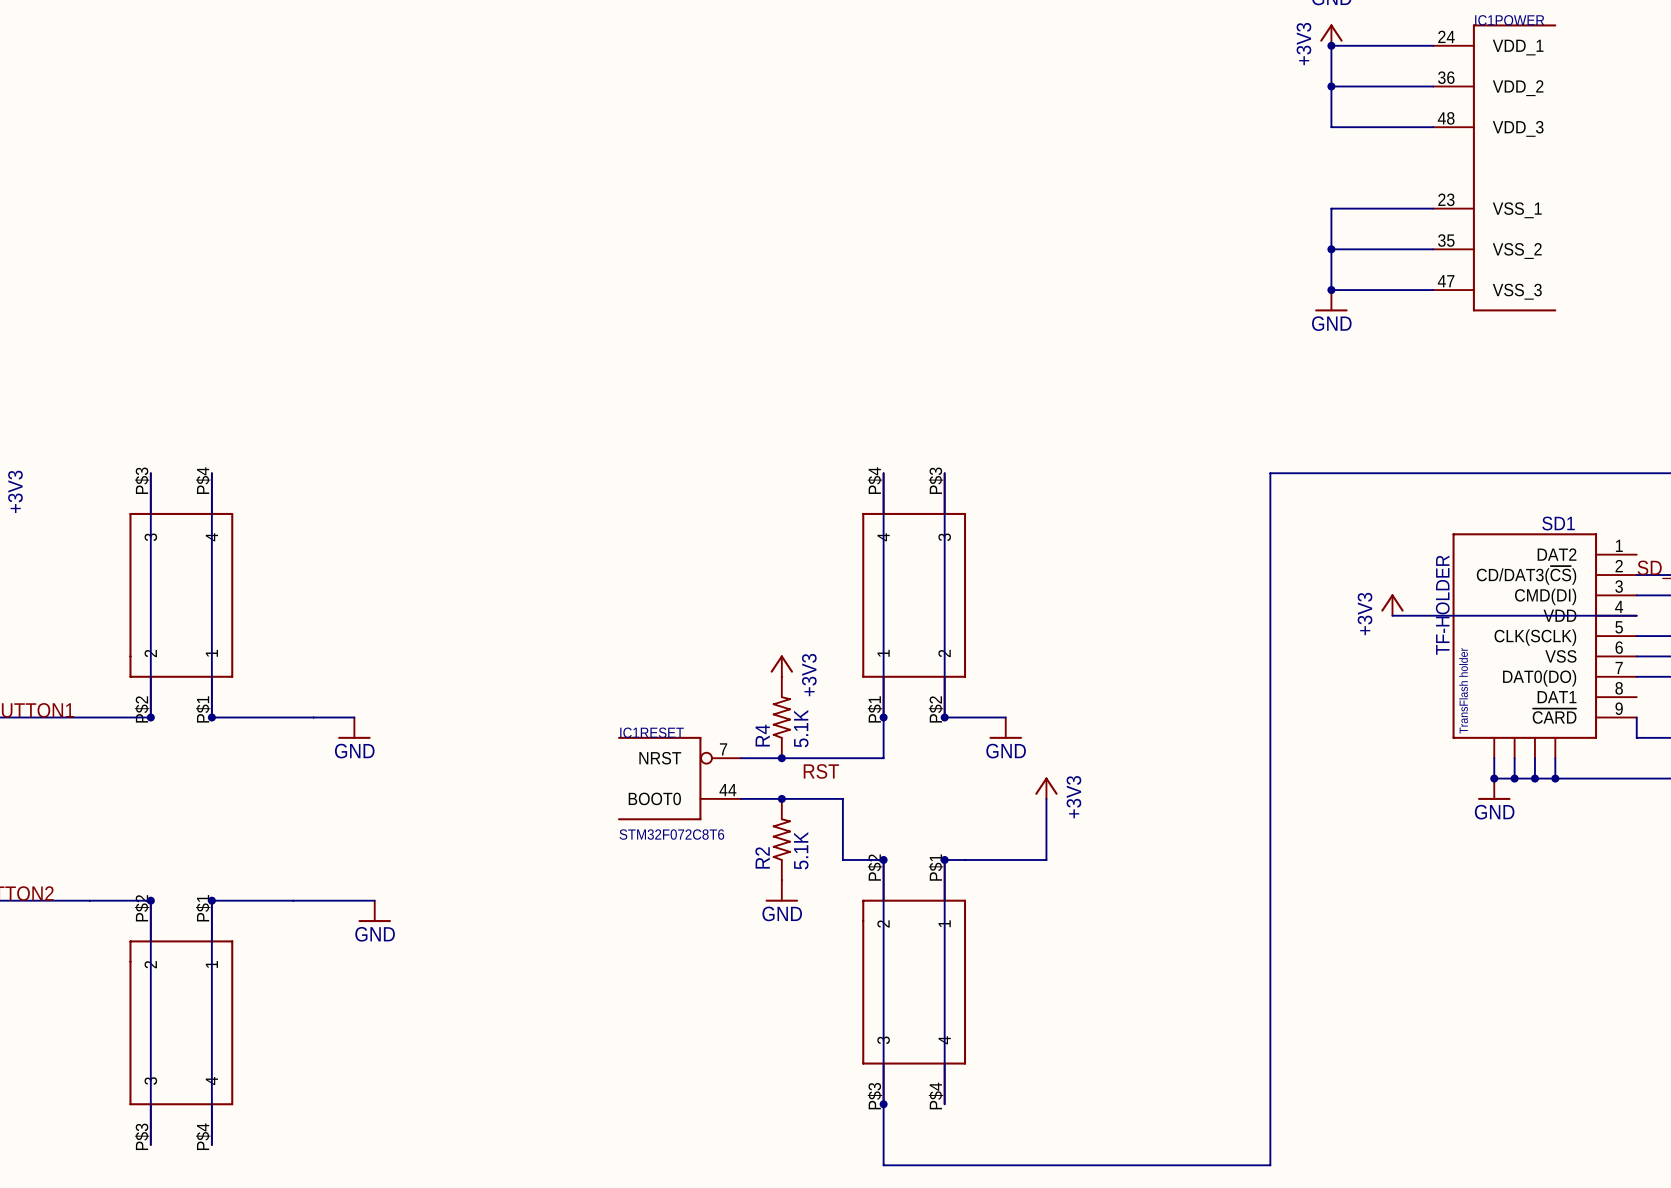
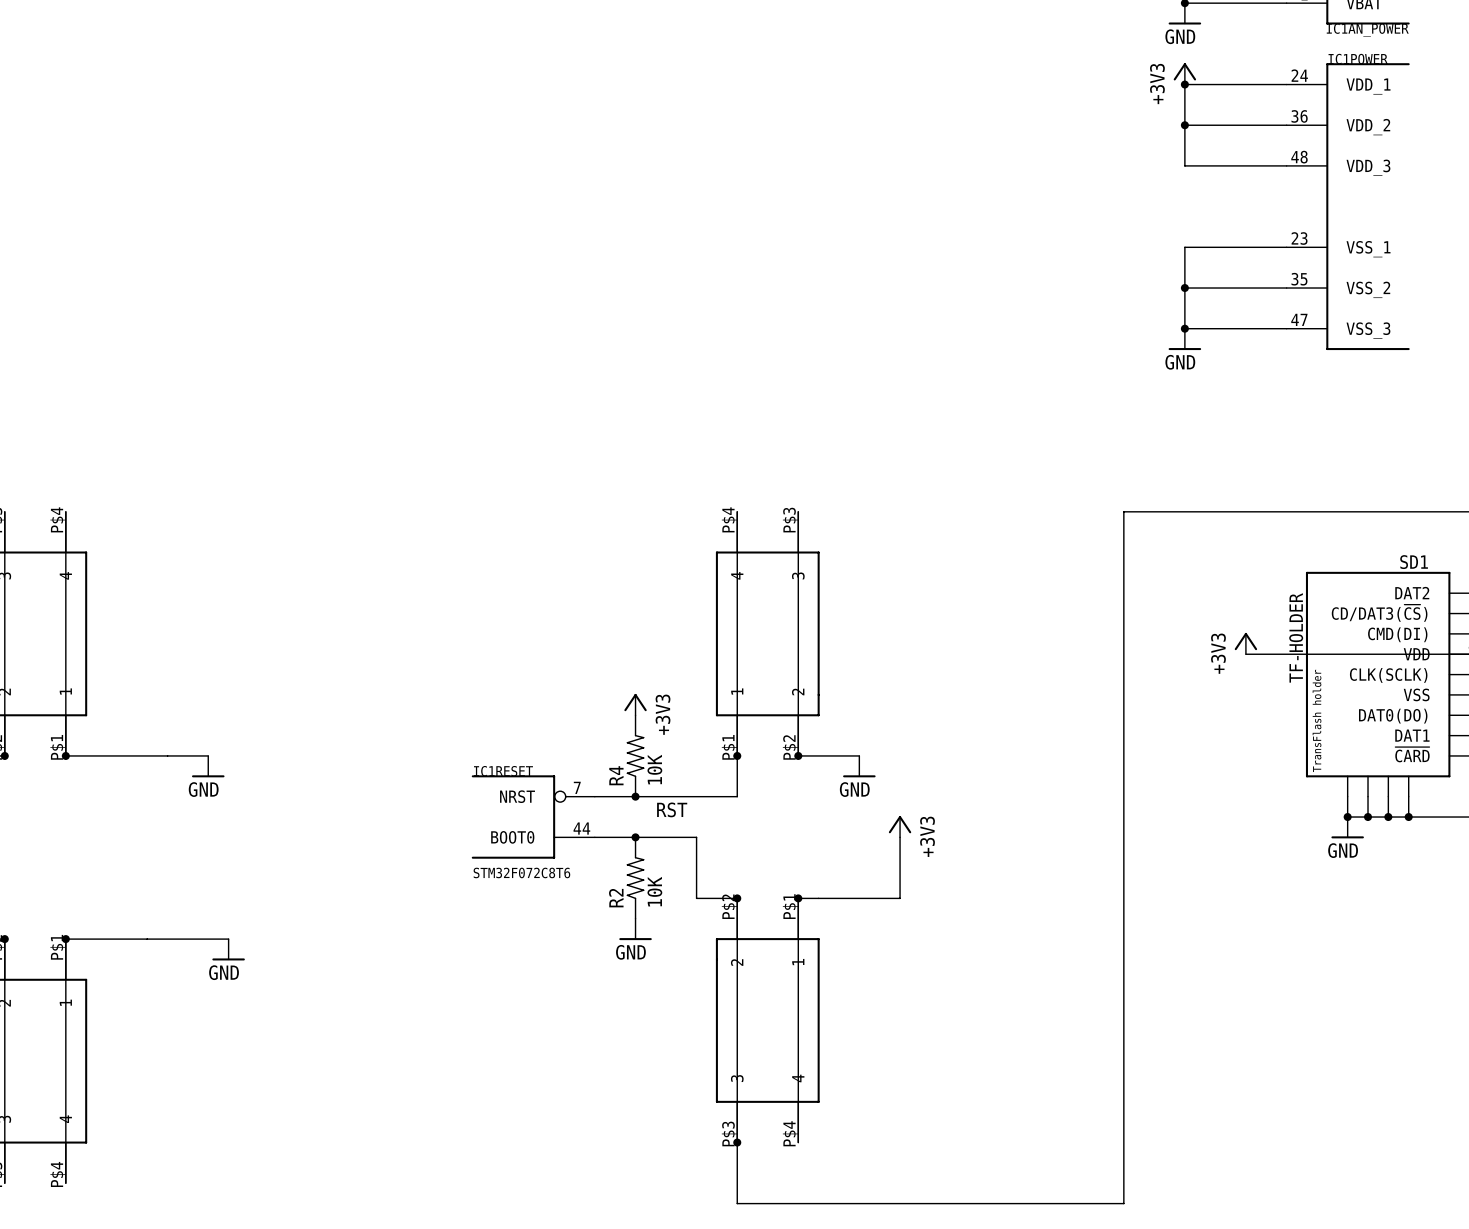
R4 value: 5.1K (801, 728) -> 10K (654, 769)
R2 value: 5.1K (801, 850) -> 10K (654, 891)

